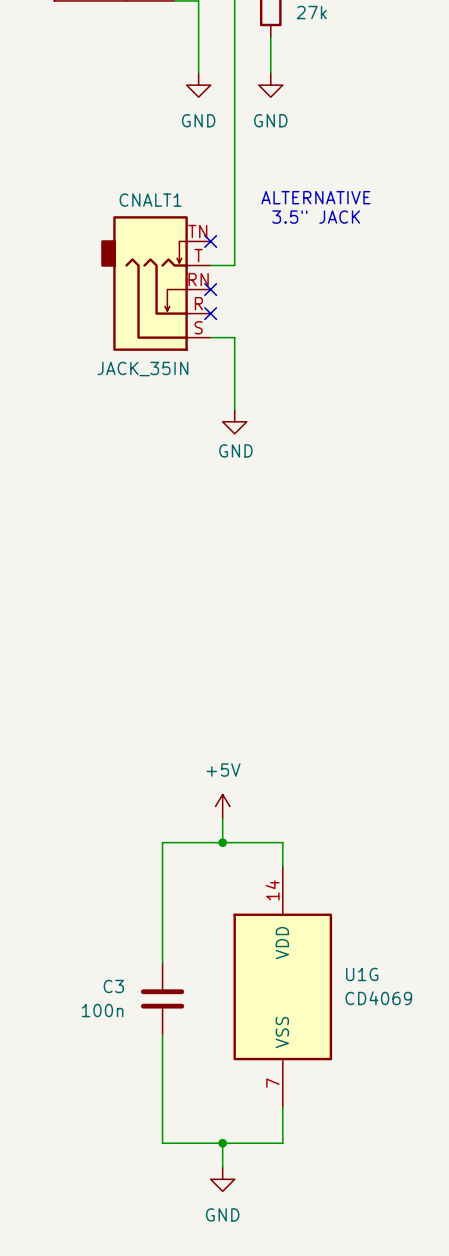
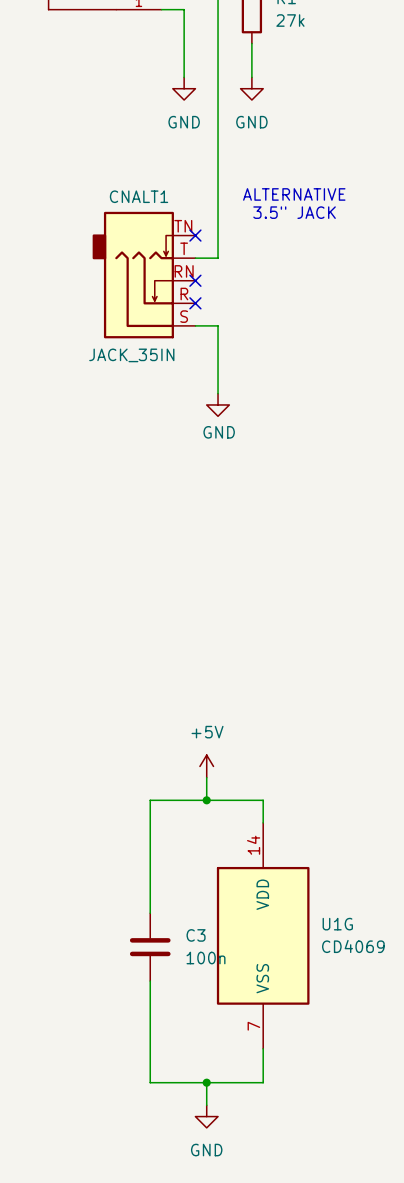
C3 name position: C3 (113, 986) -> C3 (196, 935)
C3 value position: 100n (102, 1010) -> 100n (206, 958)

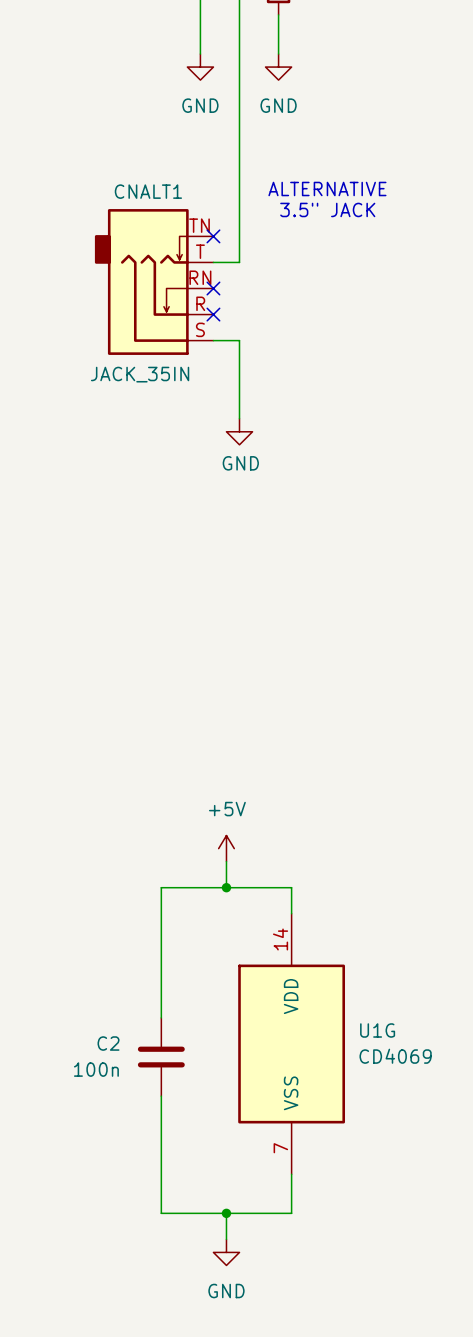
C3 name: C3 (196, 935) -> C2 (108, 1043)
C3 value position: 100n (206, 958) -> 100n (96, 1069)

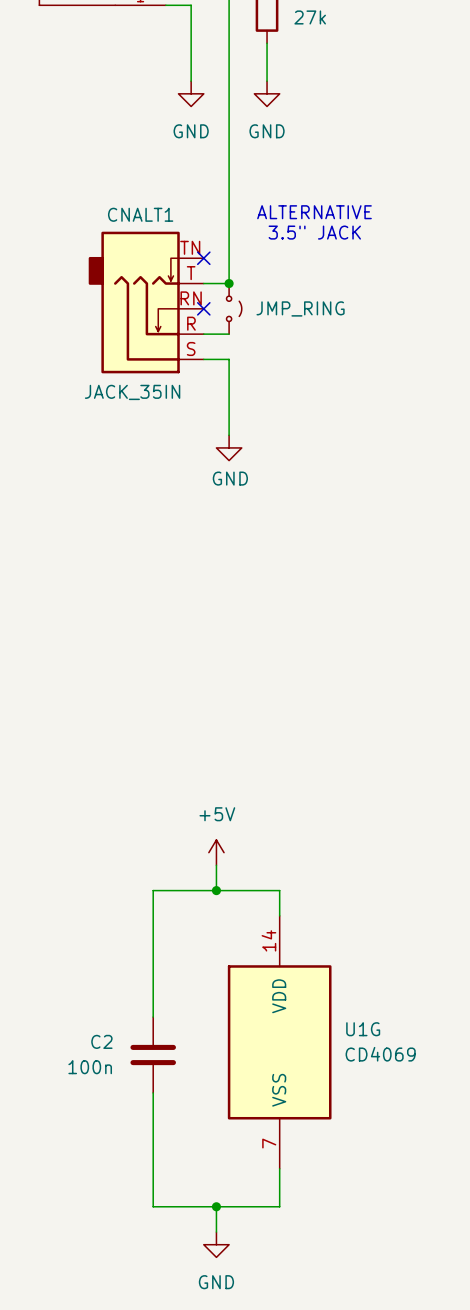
junction: none -> (229, 283)
part: none -> JMP_RING (234, 308)
wire: none -> (203, 334) (229, 334)
no-connect mark: (213, 314) -> none

